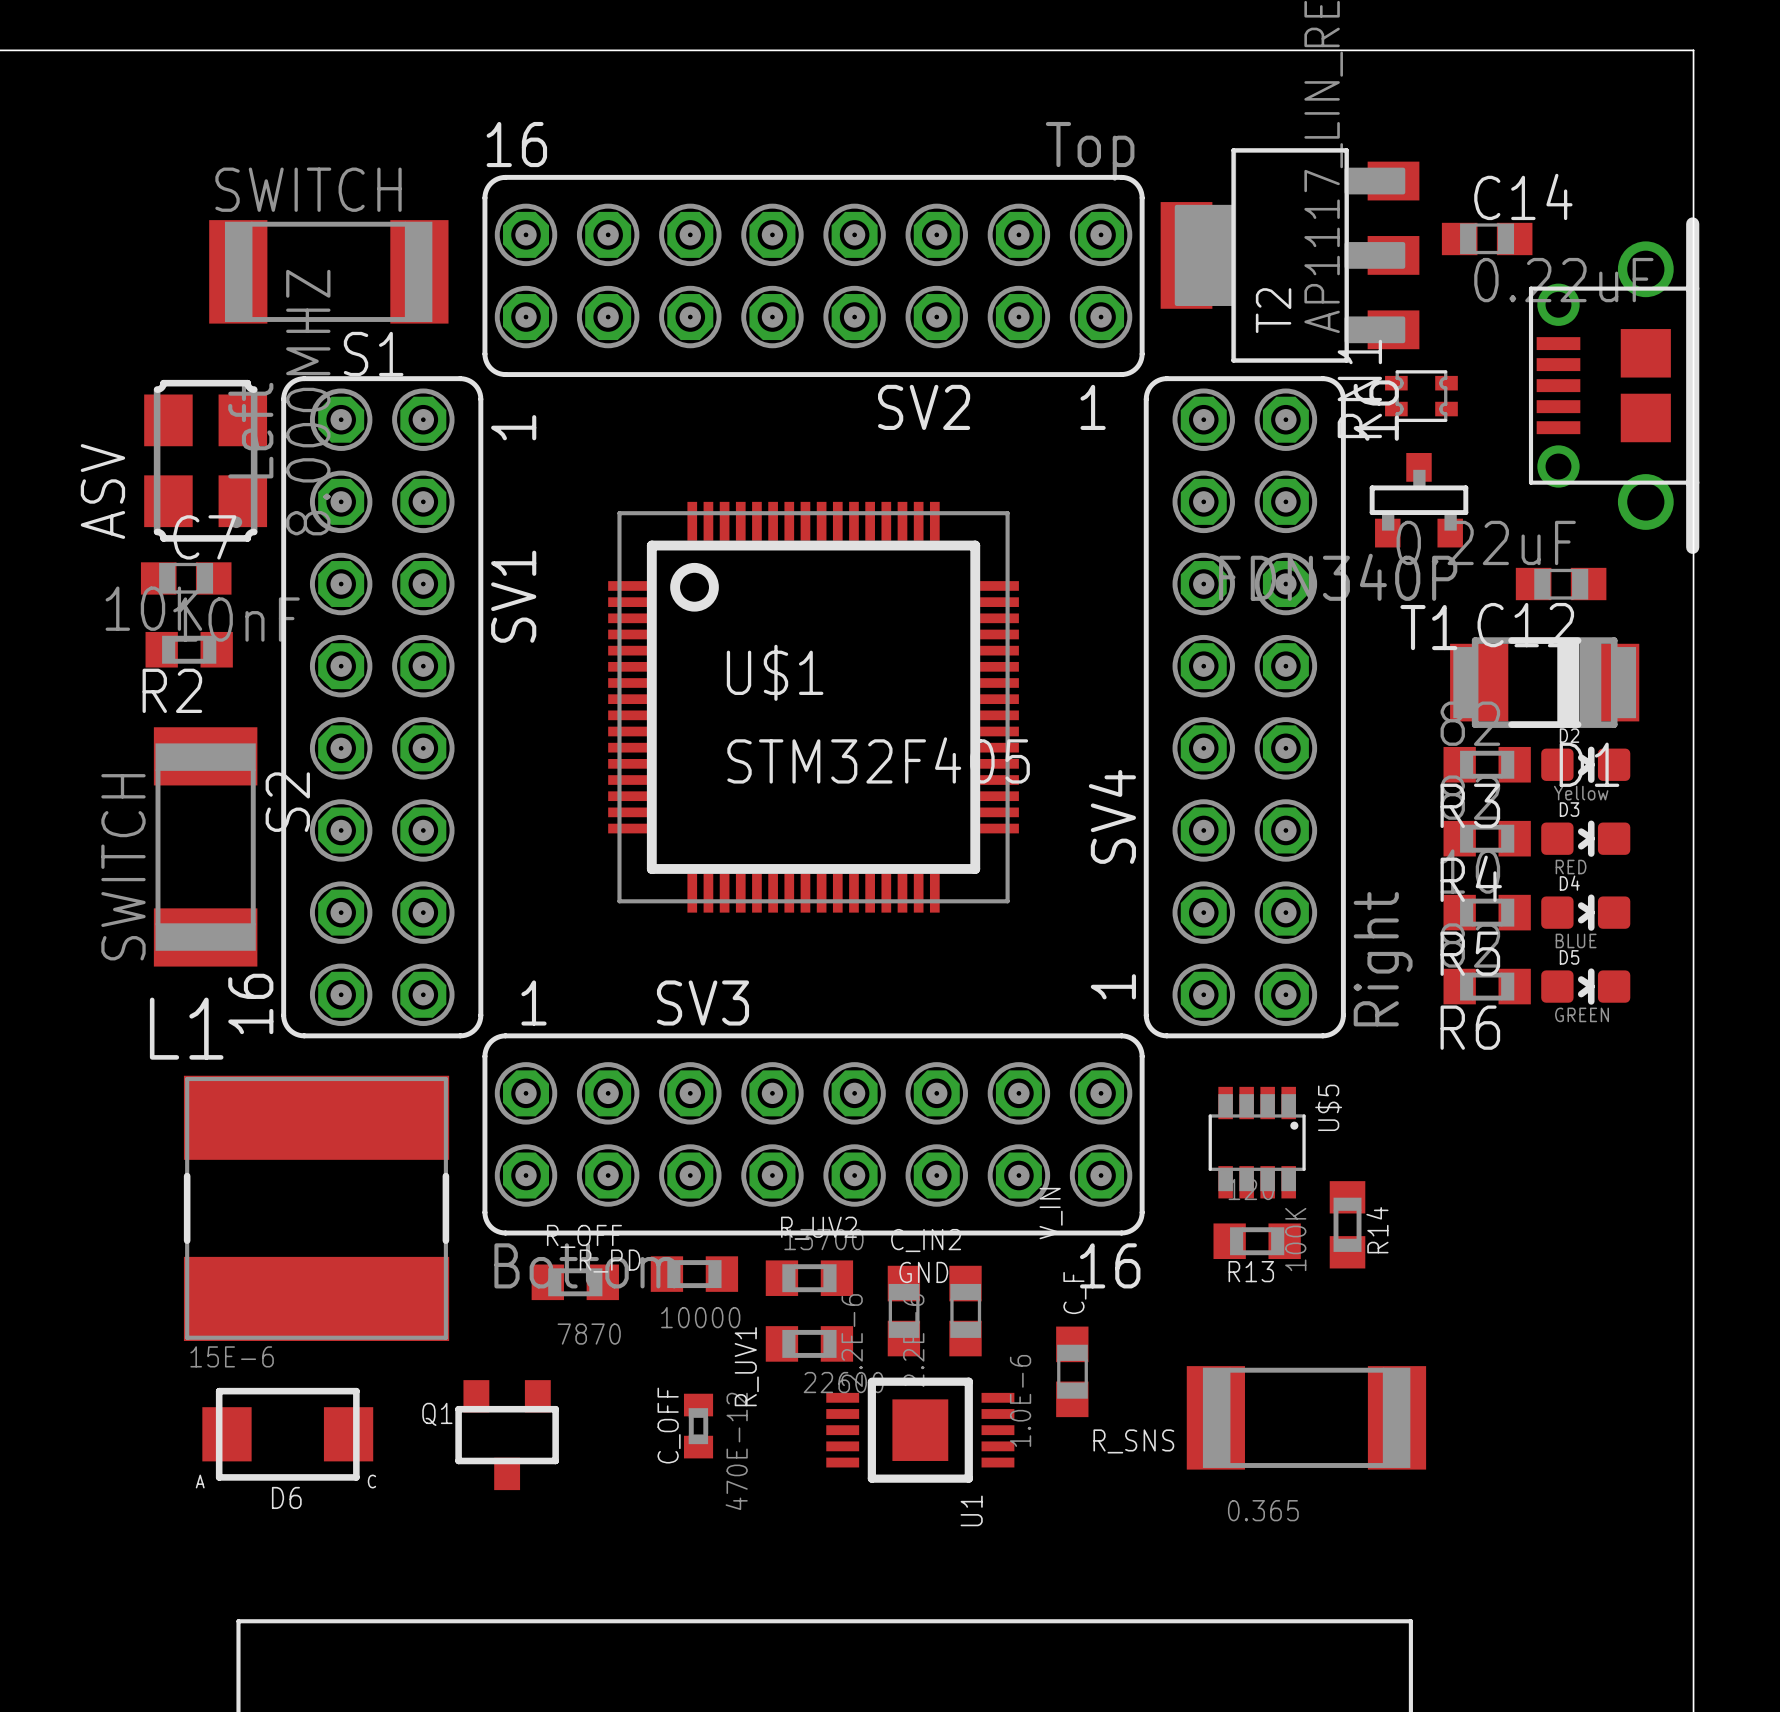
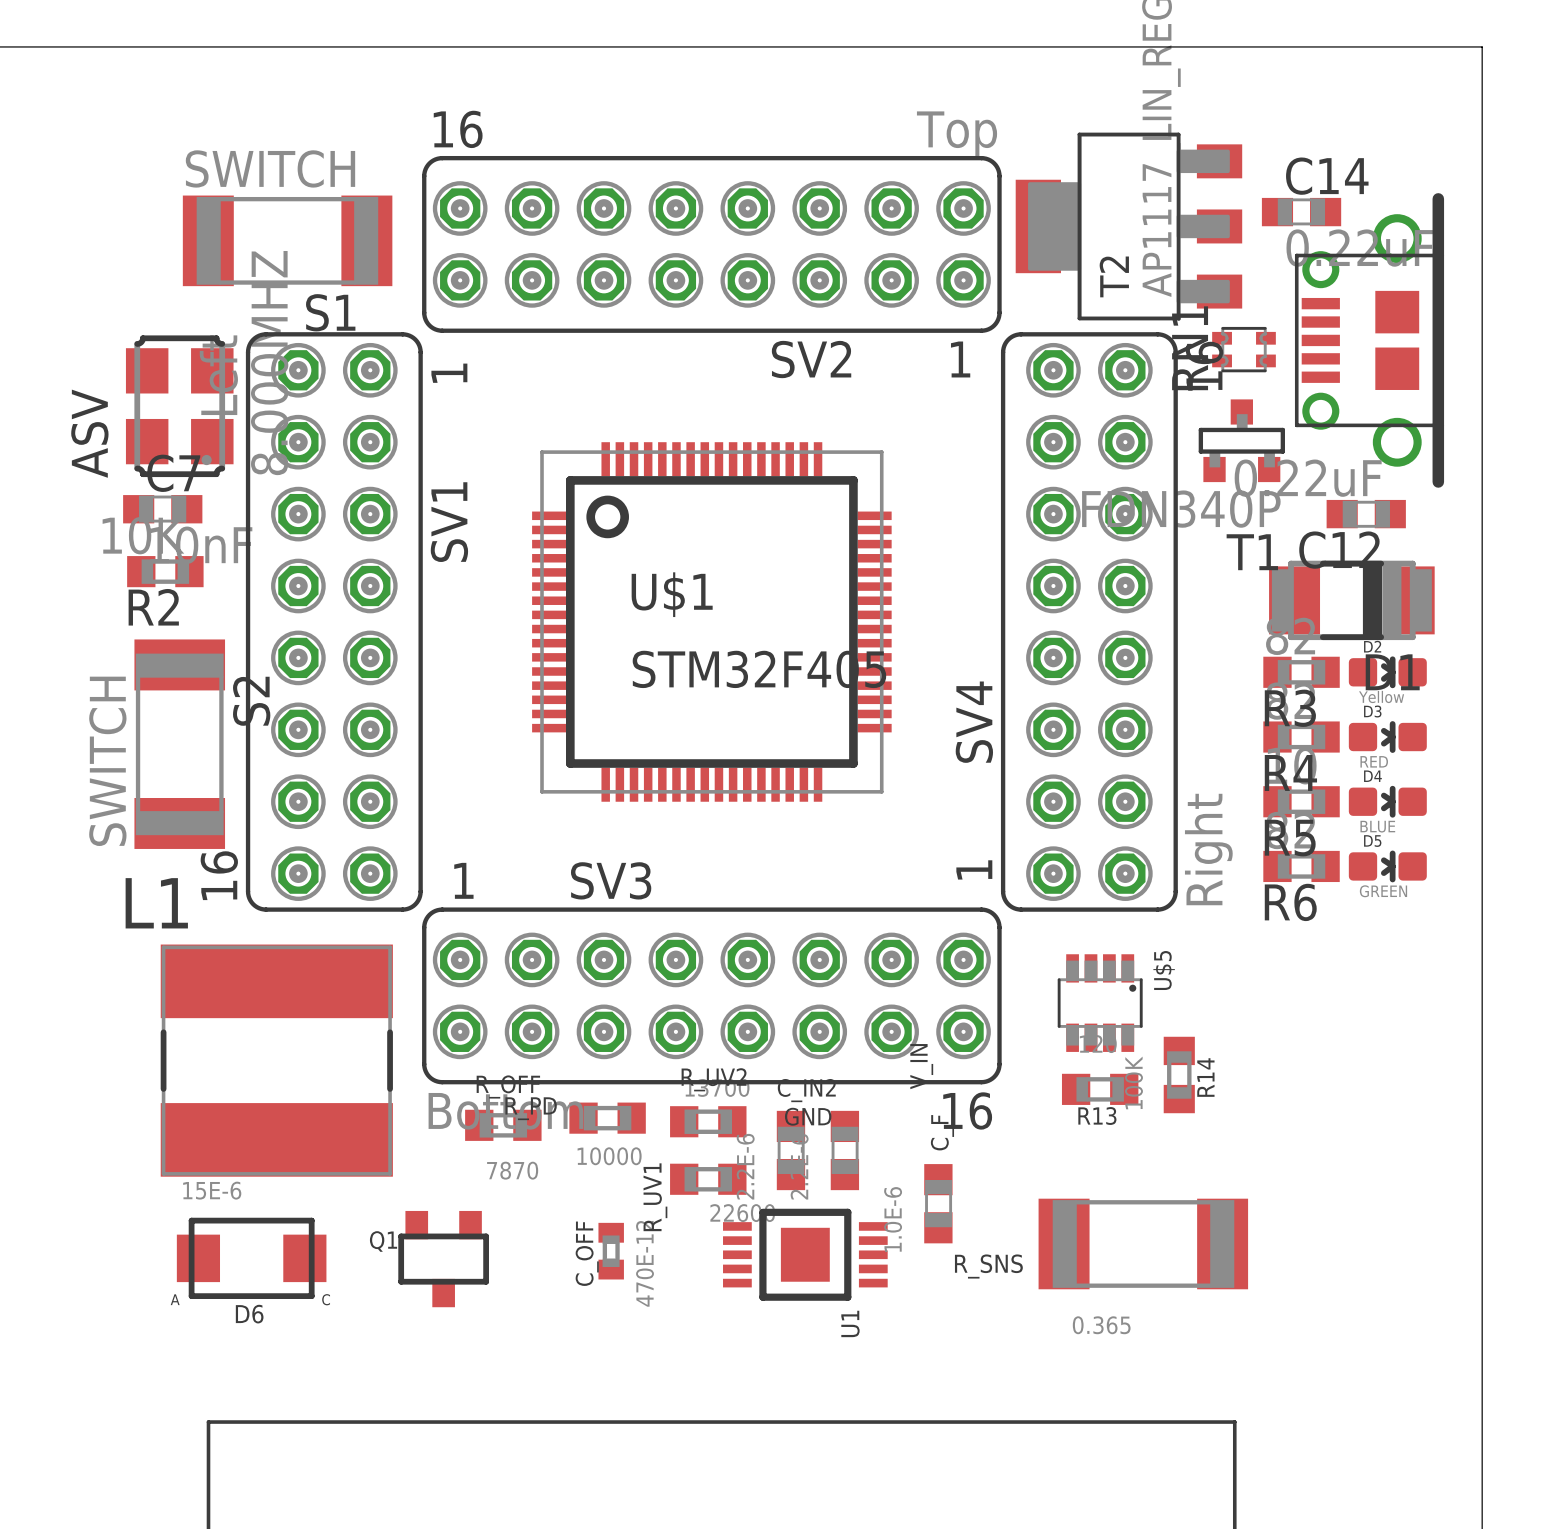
part position: (1614, 385) -> (1369, 340)

